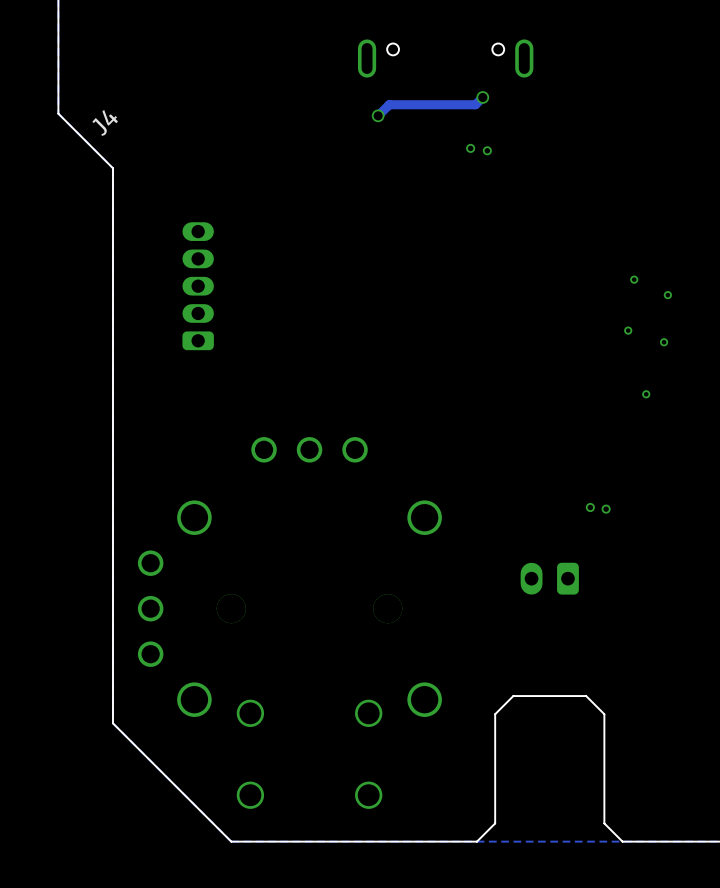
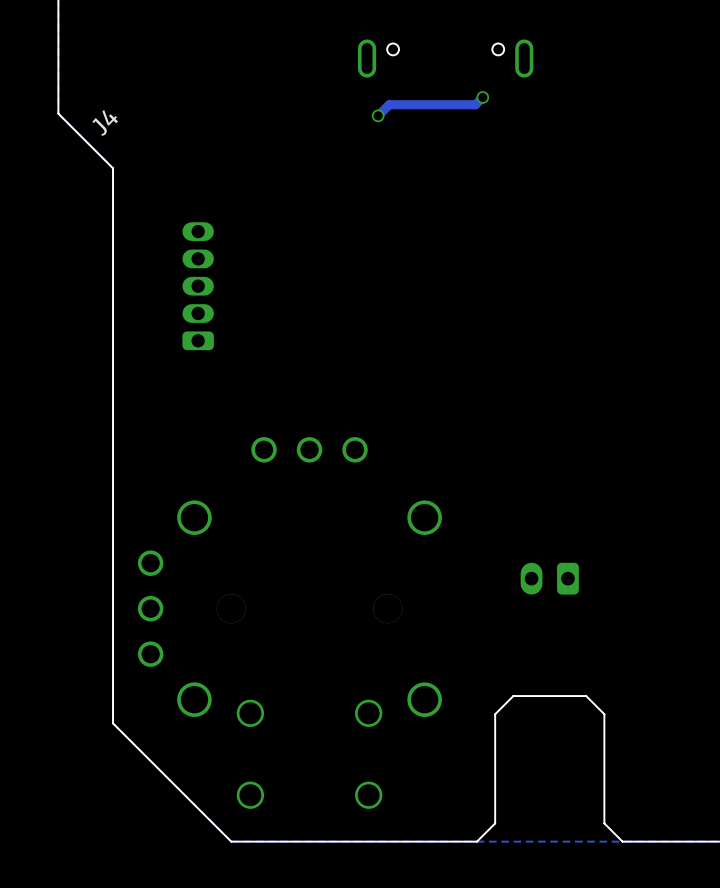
via: (470, 148) -> none
via: (487, 150) -> none
via: (634, 279) -> none
via: (667, 295) -> none
via: (628, 330) -> none
via: (664, 342) -> none
via: (646, 394) -> none
via: (590, 507) -> none
via: (606, 509) -> none

